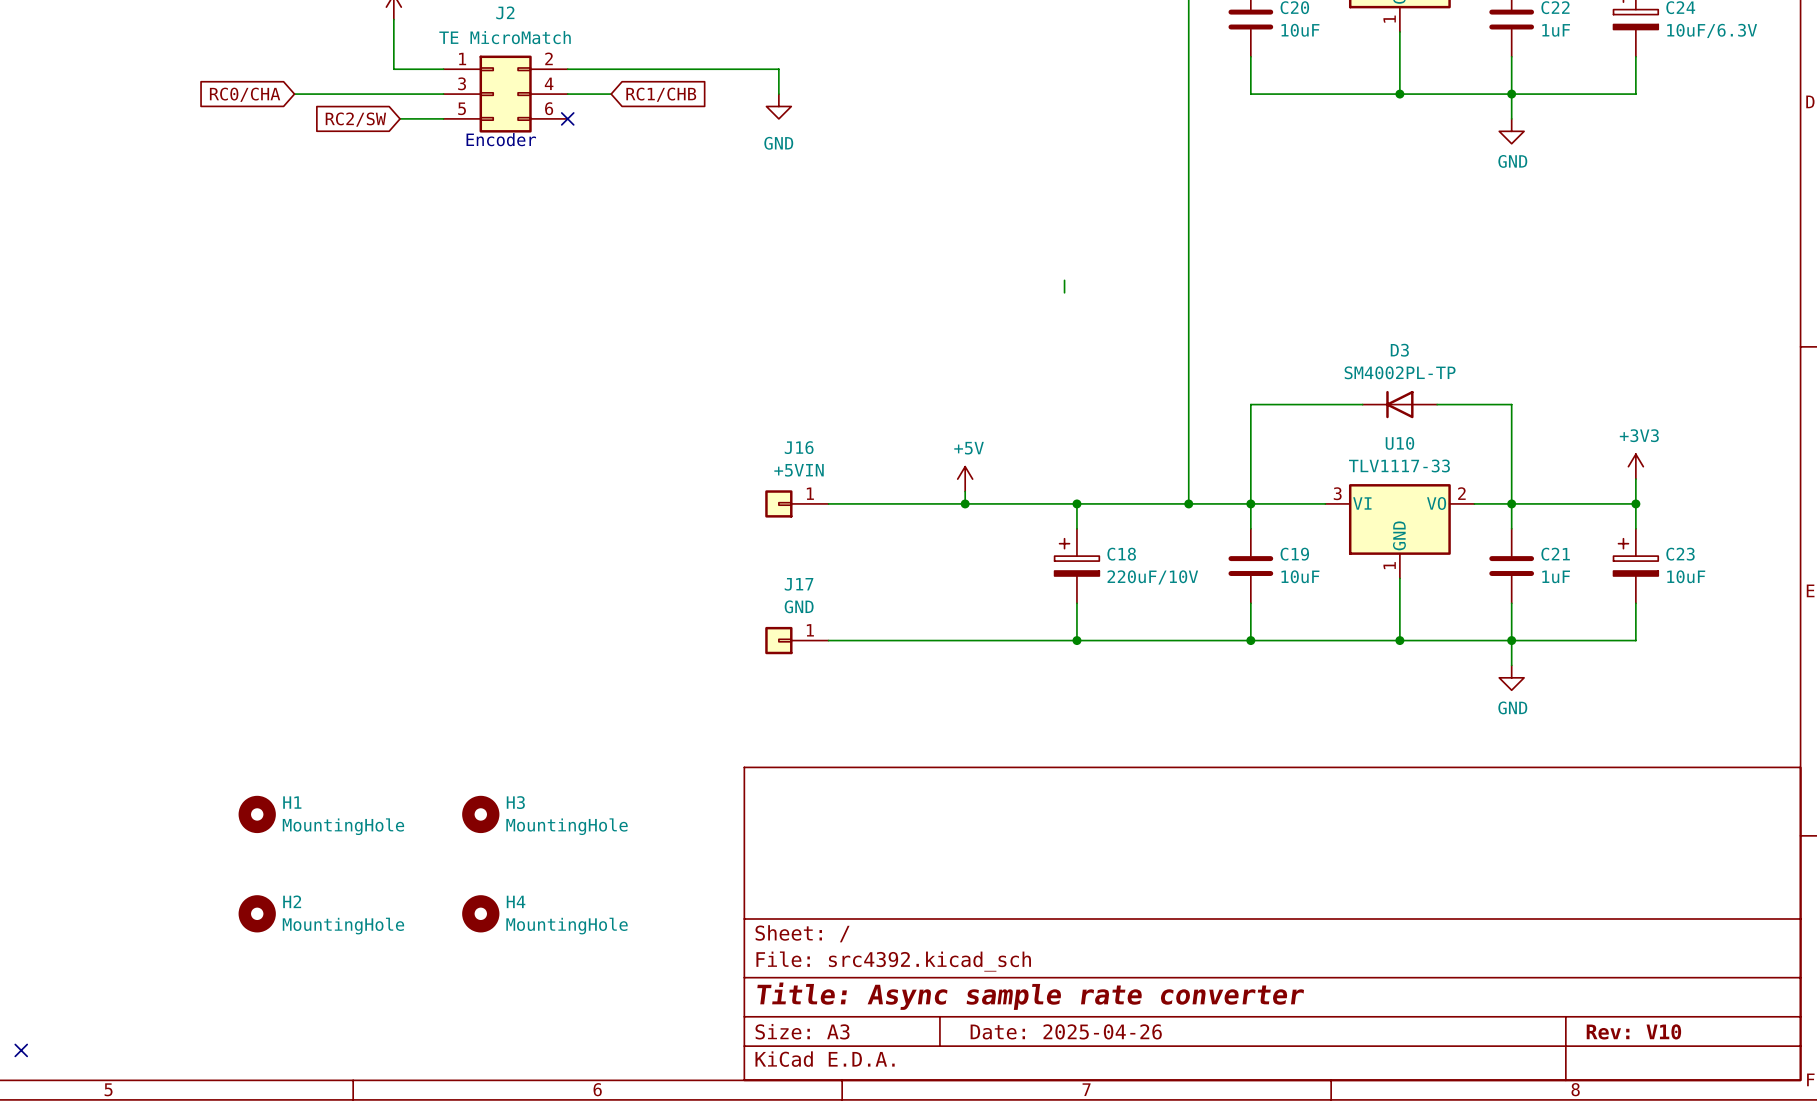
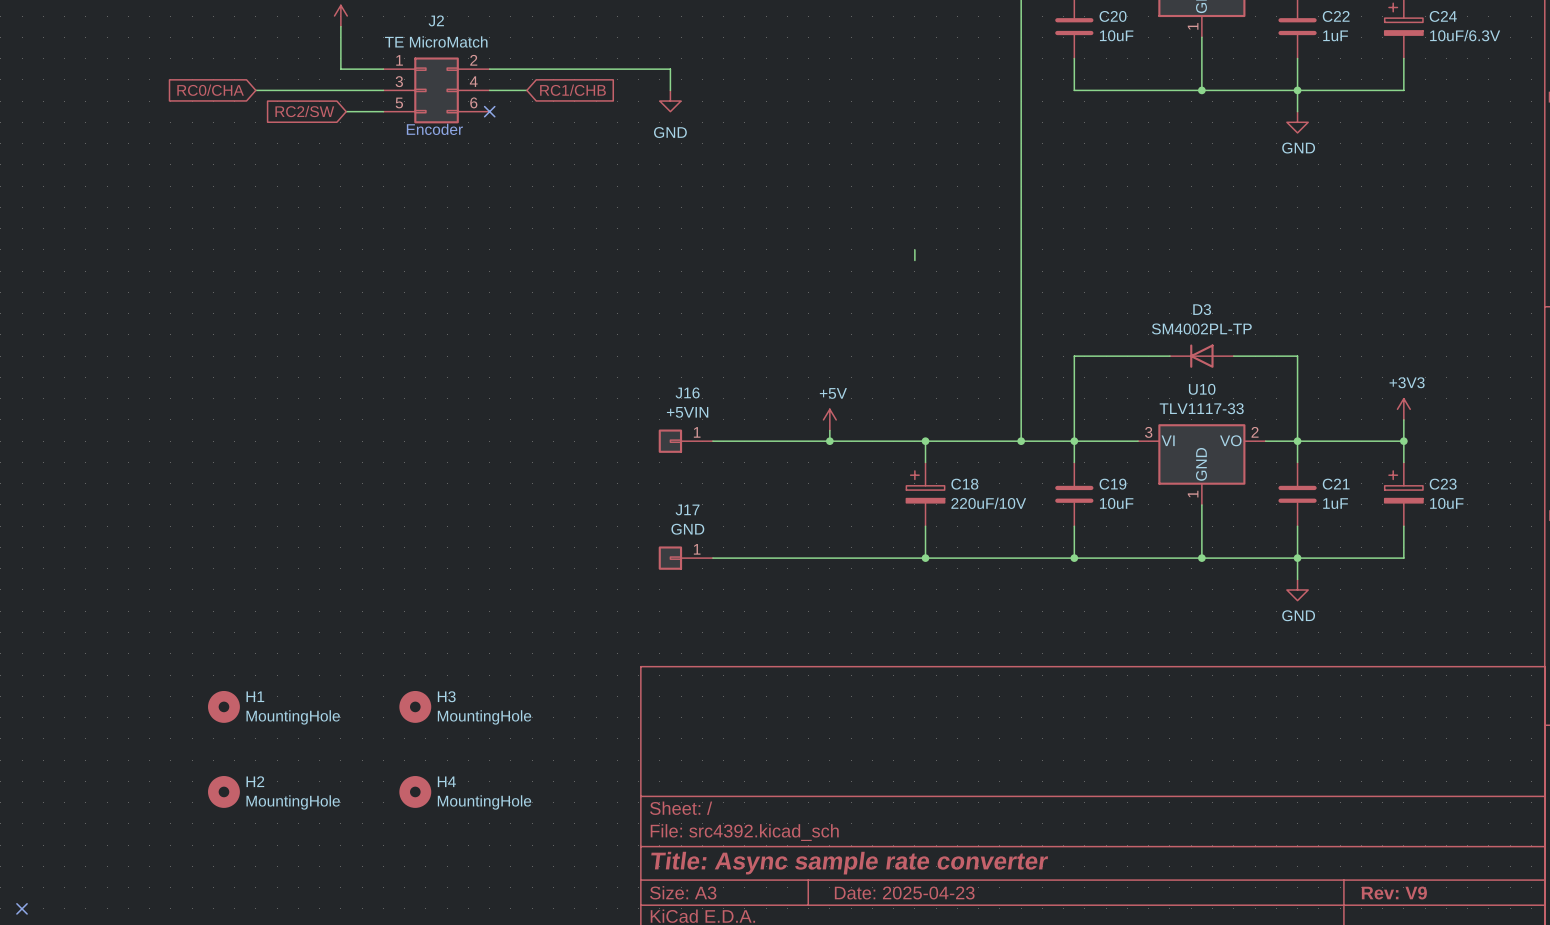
title block: Date: 2025-04-26 (1066, 1031) -> Date: 2025-04-23 (904, 893)
title block: Rev: V10 (1633, 1031) -> Rev: V9 (1394, 893)

